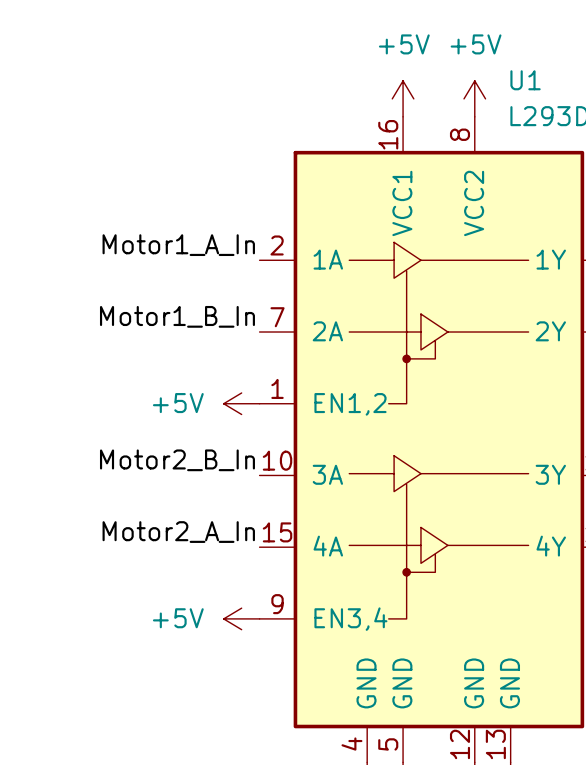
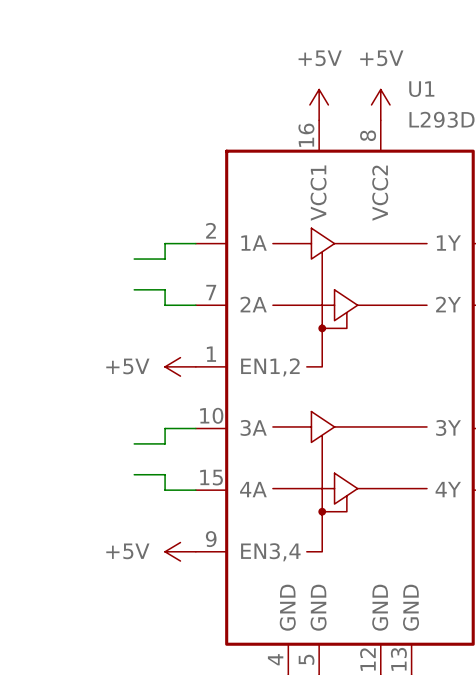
label: Motor1_A_In (178, 245) -> none
wire: none -> (195, 243) (165, 243) (165, 259) (134, 259)
wire: none -> (134, 289) (165, 289) (165, 305) (195, 305)
label: Motor1_B_In (177, 316) -> none
label: Motor2_B_In (177, 460) -> none
wire: none -> (195, 428) (165, 428) (165, 443) (134, 443)
wire: none -> (134, 474) (165, 474) (165, 490) (195, 490)
label: Motor2_A_In (178, 532) -> none

